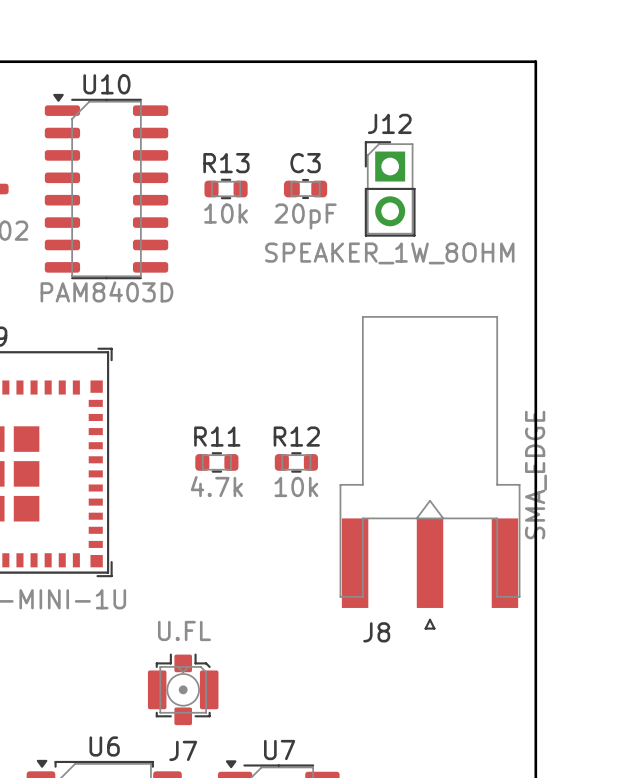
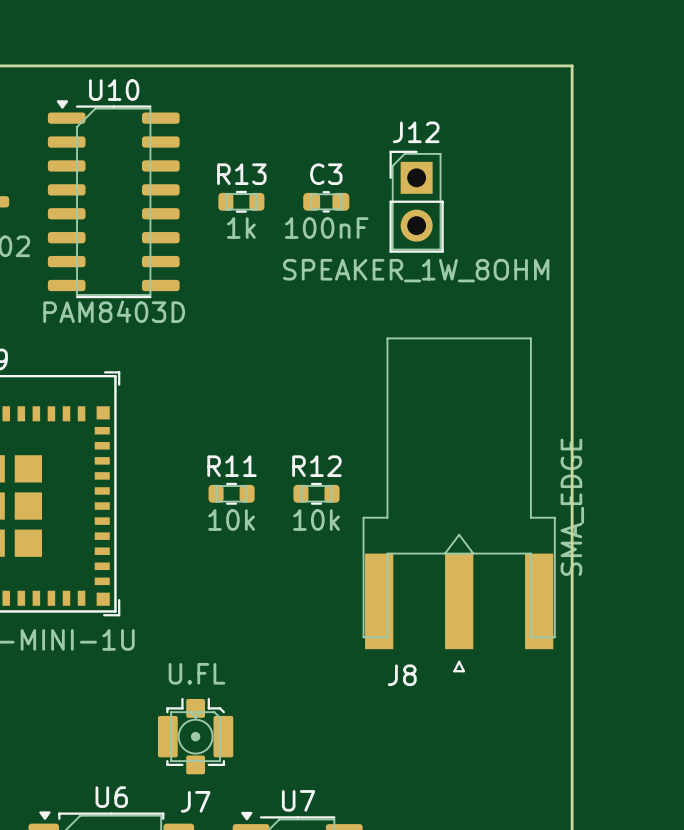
R13 value: 10k (226, 213) -> 1k (241, 228)
C3 value: 20pF (305, 216) -> 100nF (326, 228)
R11 value: 4.7k (216, 486) -> 10k (231, 520)

